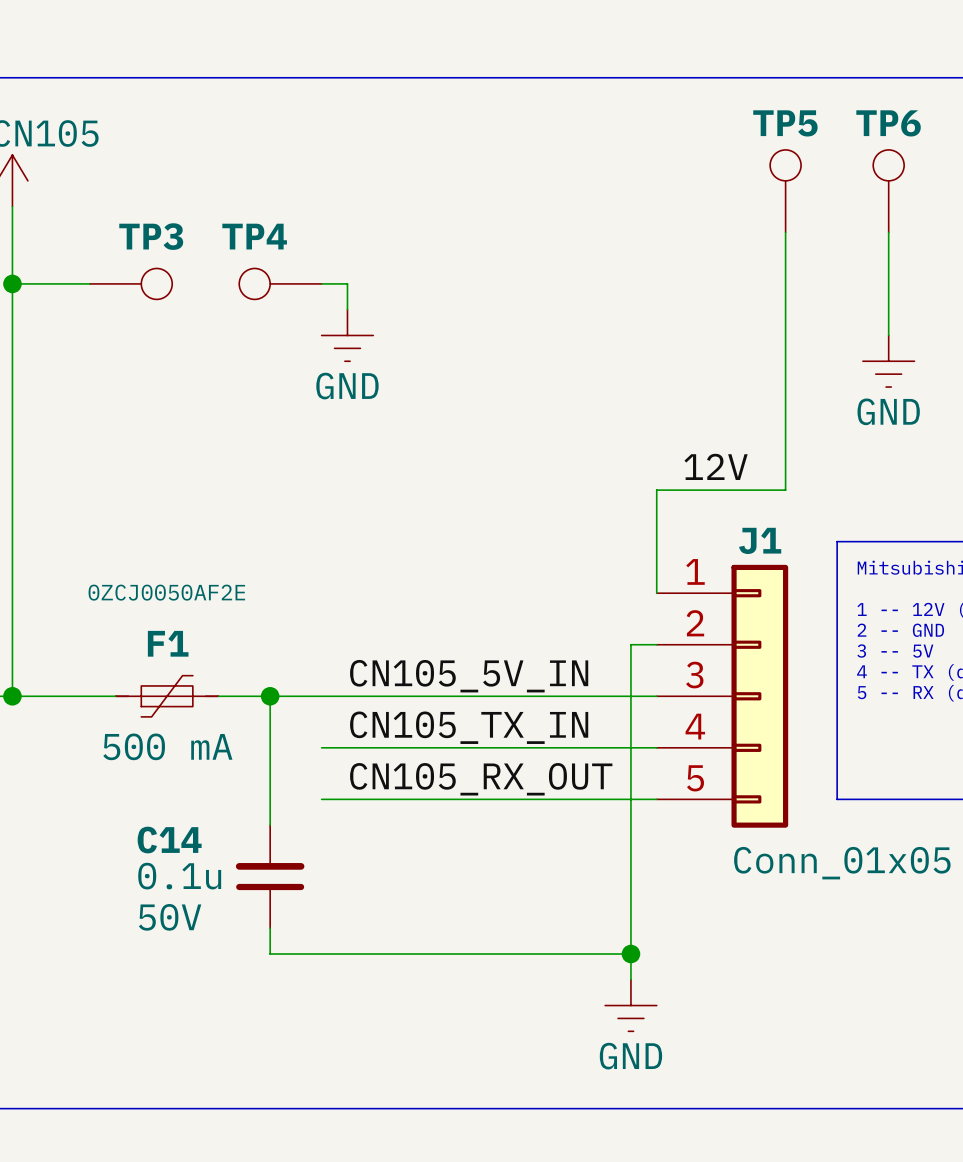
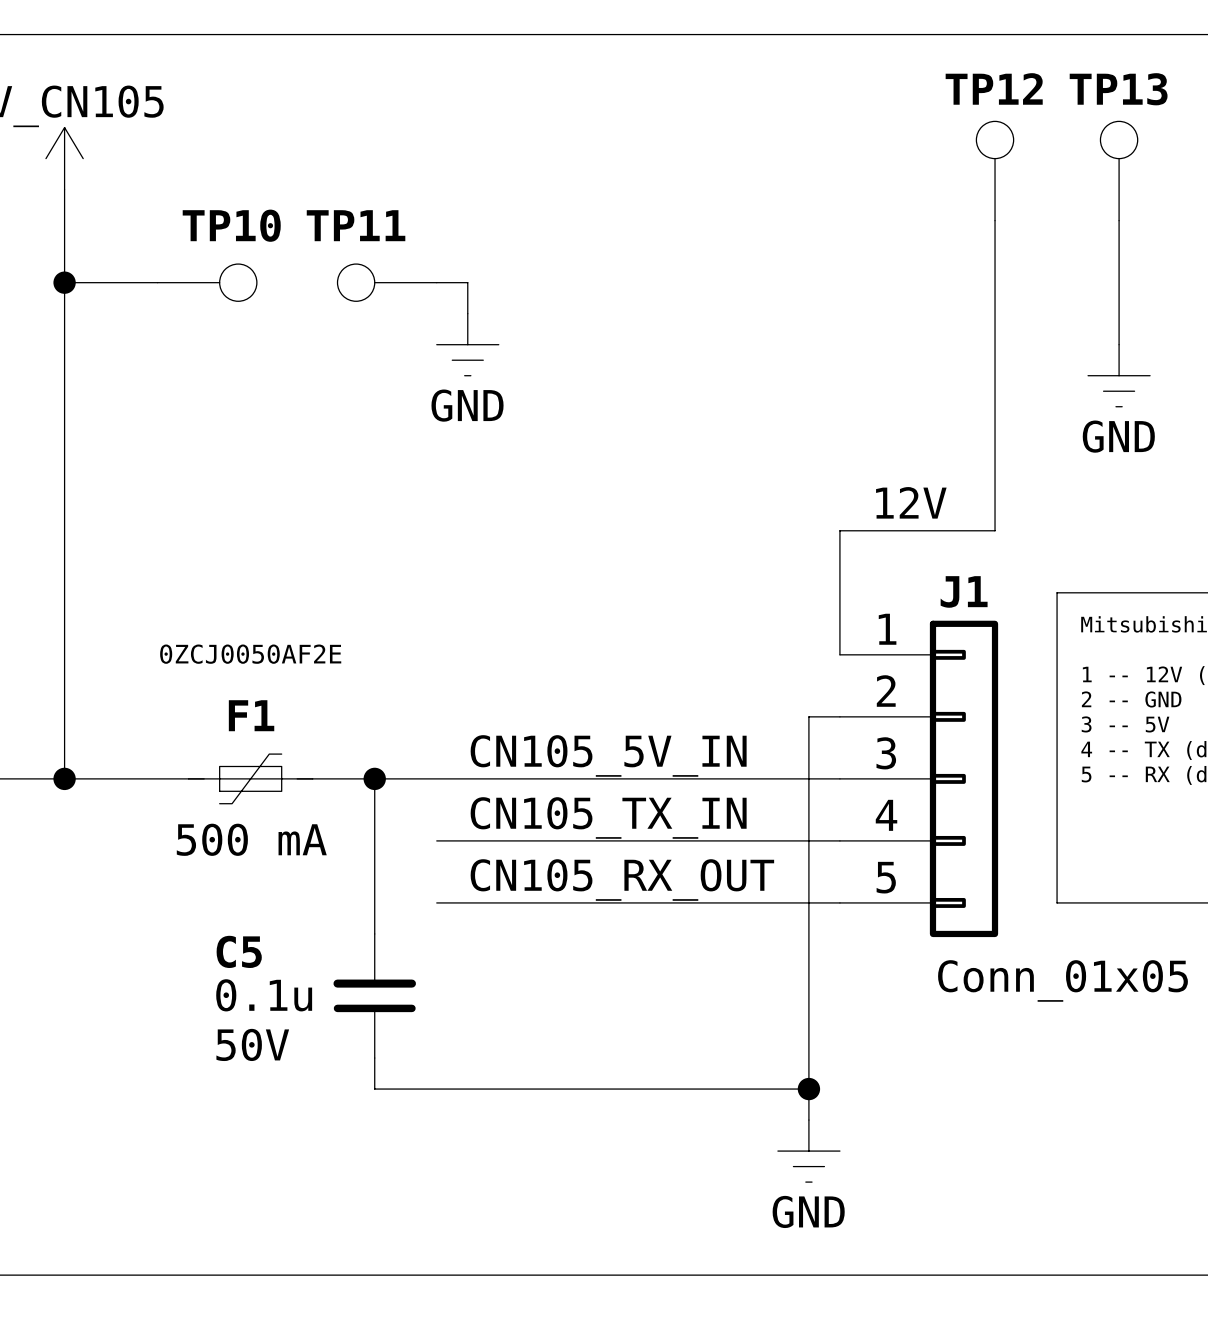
TP5 name: TP5 (785, 123) -> TP12 (994, 88)
TP6 name: TP6 (888, 123) -> TP13 (1118, 89)
TP3 name: TP3 (151, 236) -> TP10 (231, 225)
TP4 name: TP4 (254, 236) -> TP11 (356, 225)
C14 name: C14 (169, 840) -> C5 (239, 951)

